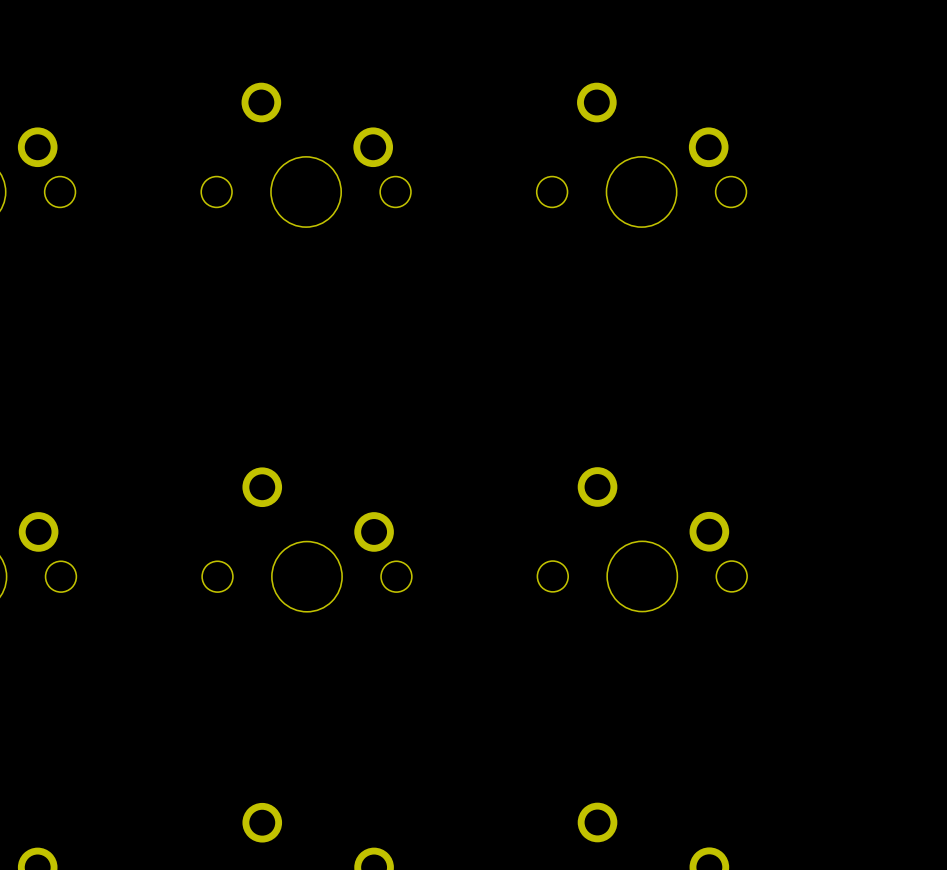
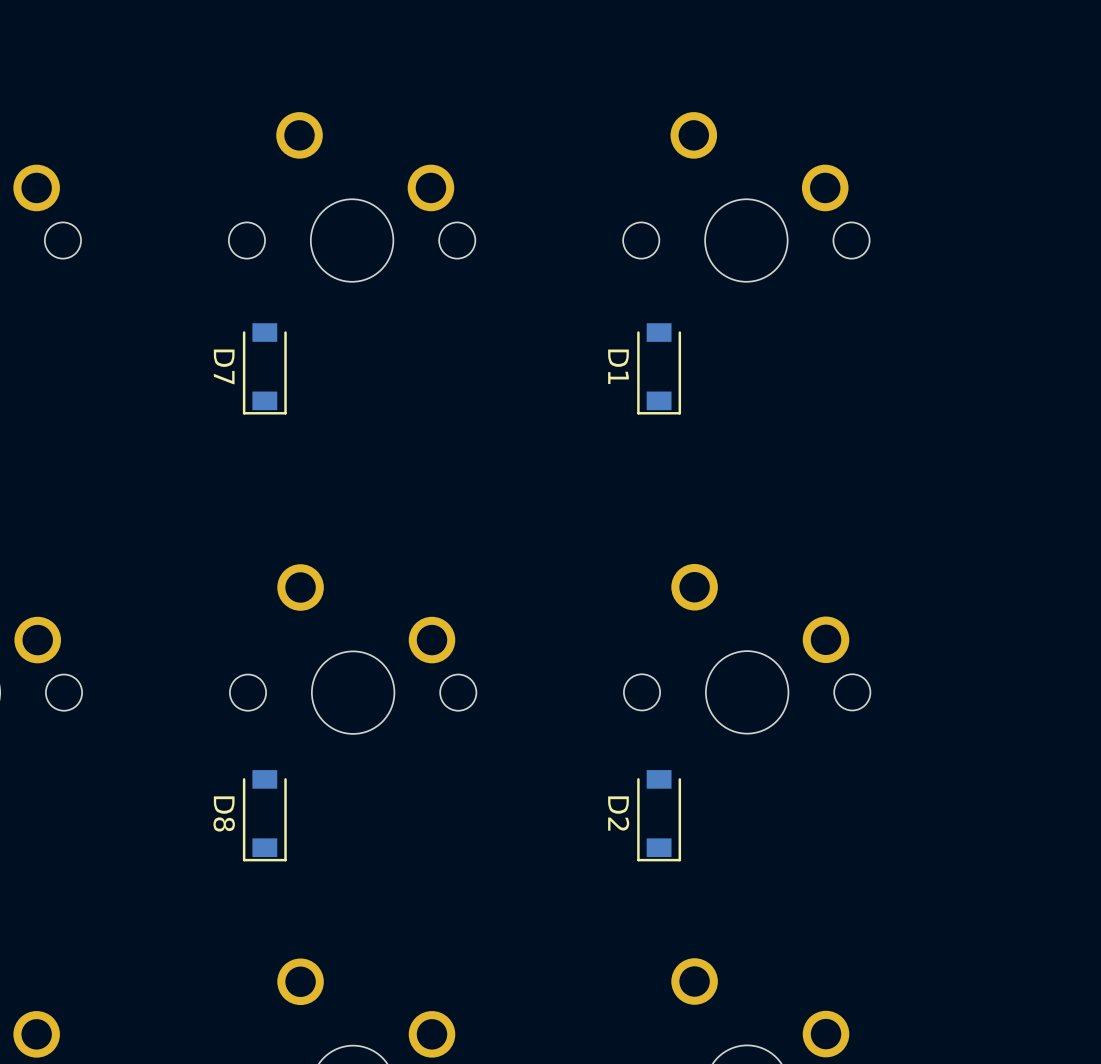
D7: none -> (264, 368)
D1: none -> (659, 368)
D8: none -> (264, 815)
D2: none -> (659, 815)

